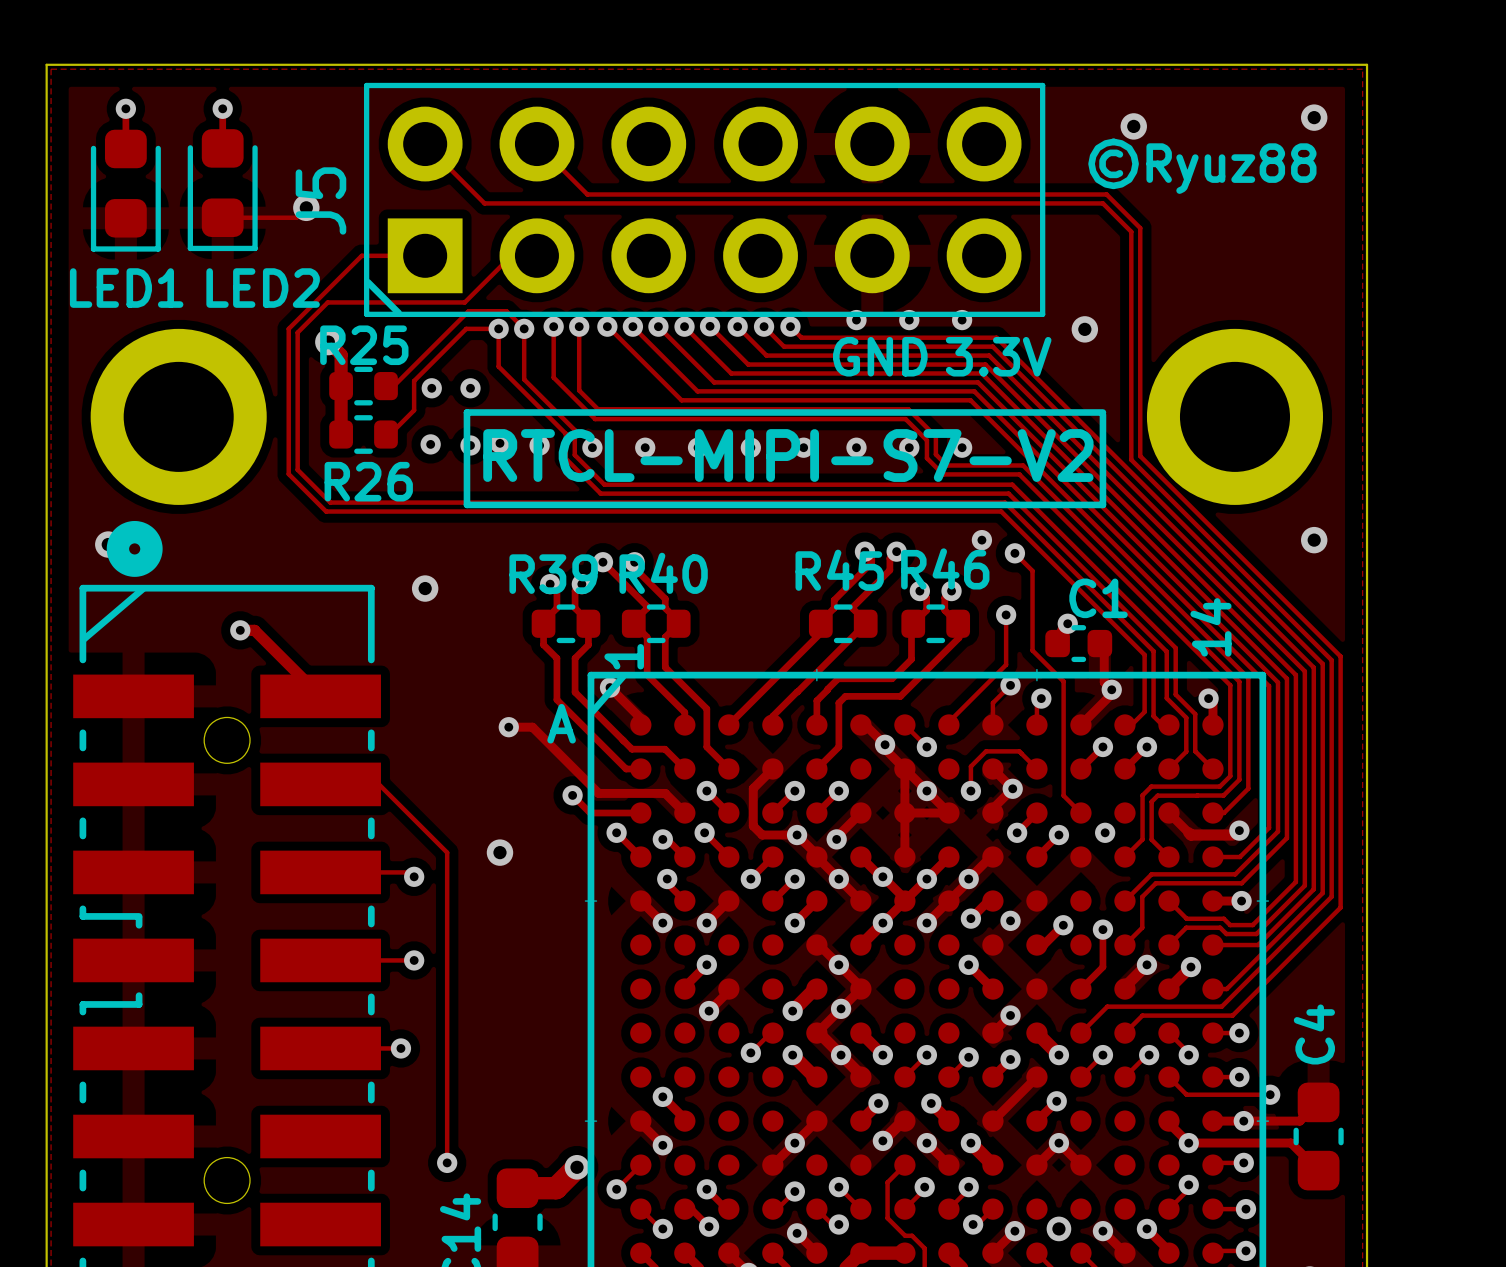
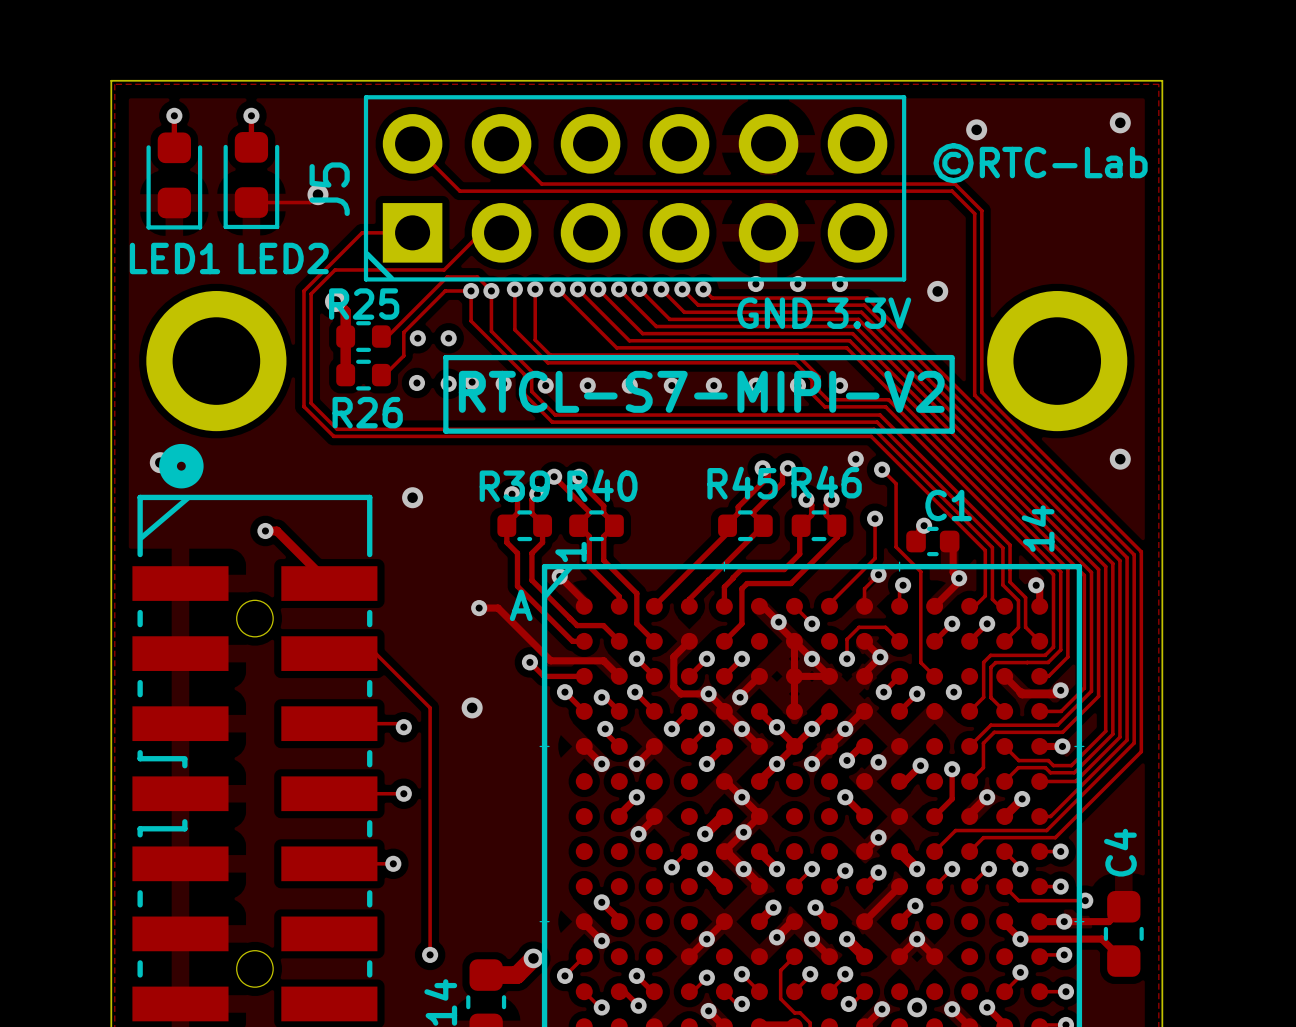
text: ©Ryuz88 (1202, 166) -> ©RTC-Lab (1040, 163)
text: RTCL-MIPI-S7-V2 (788, 455) -> RTCL-S7-MIPI-V2 (701, 391)

